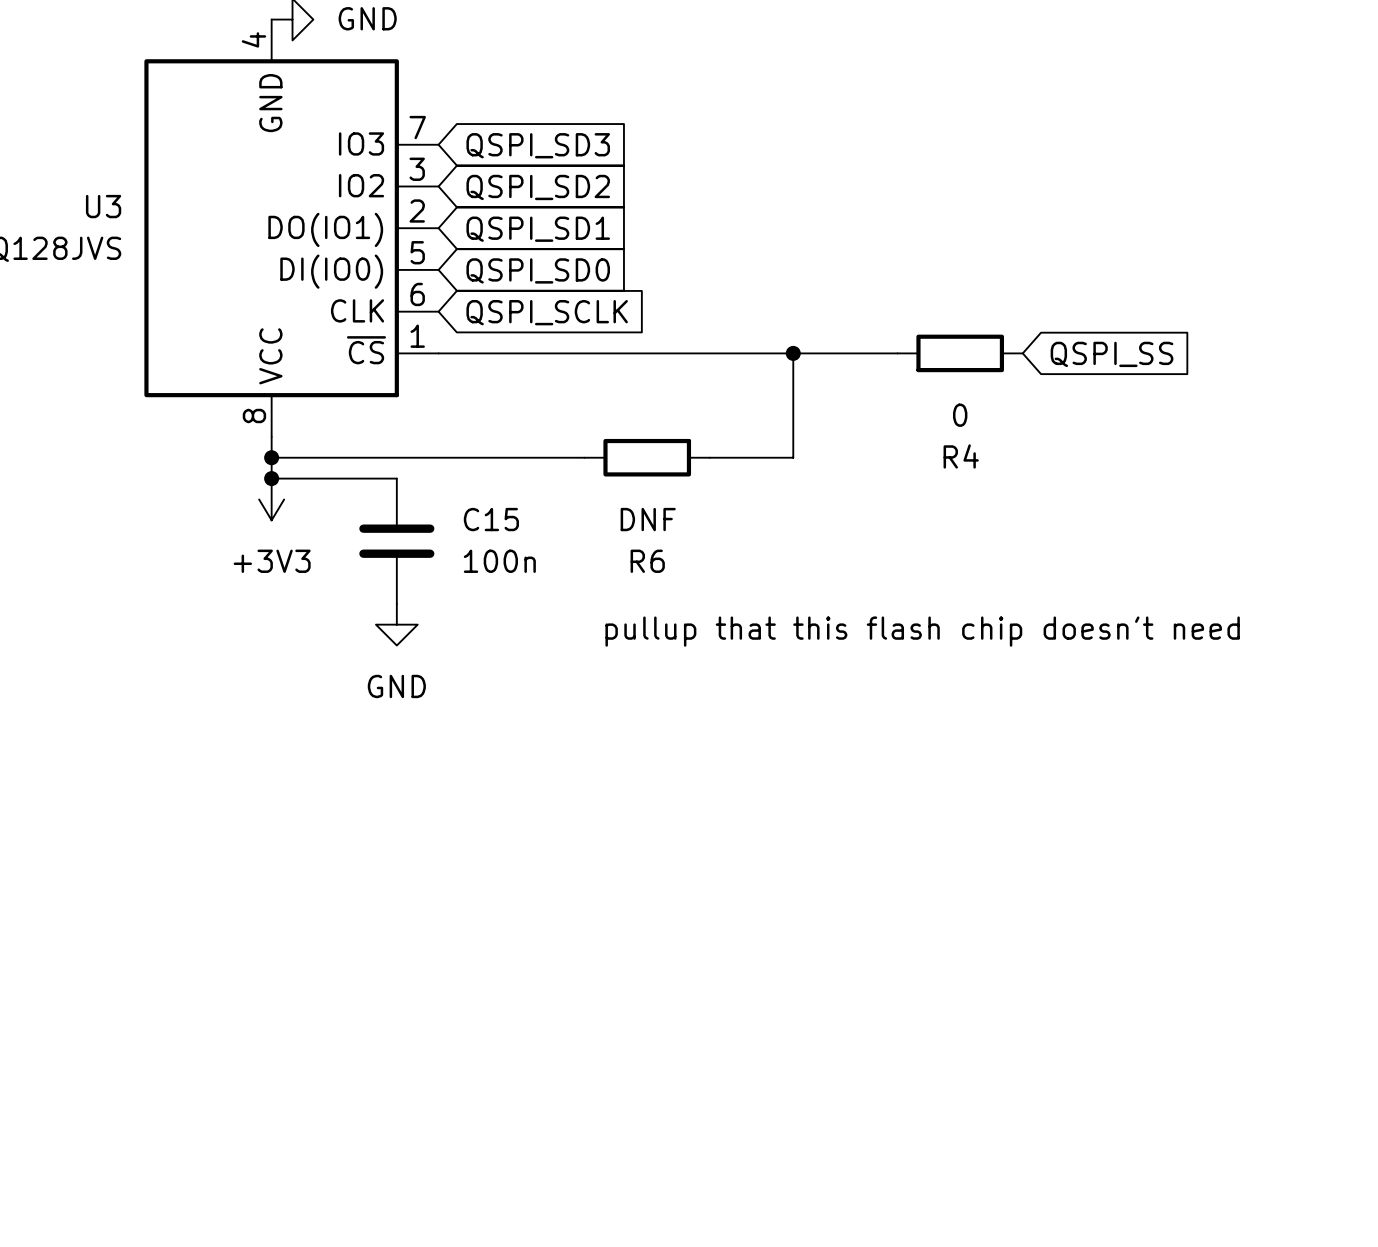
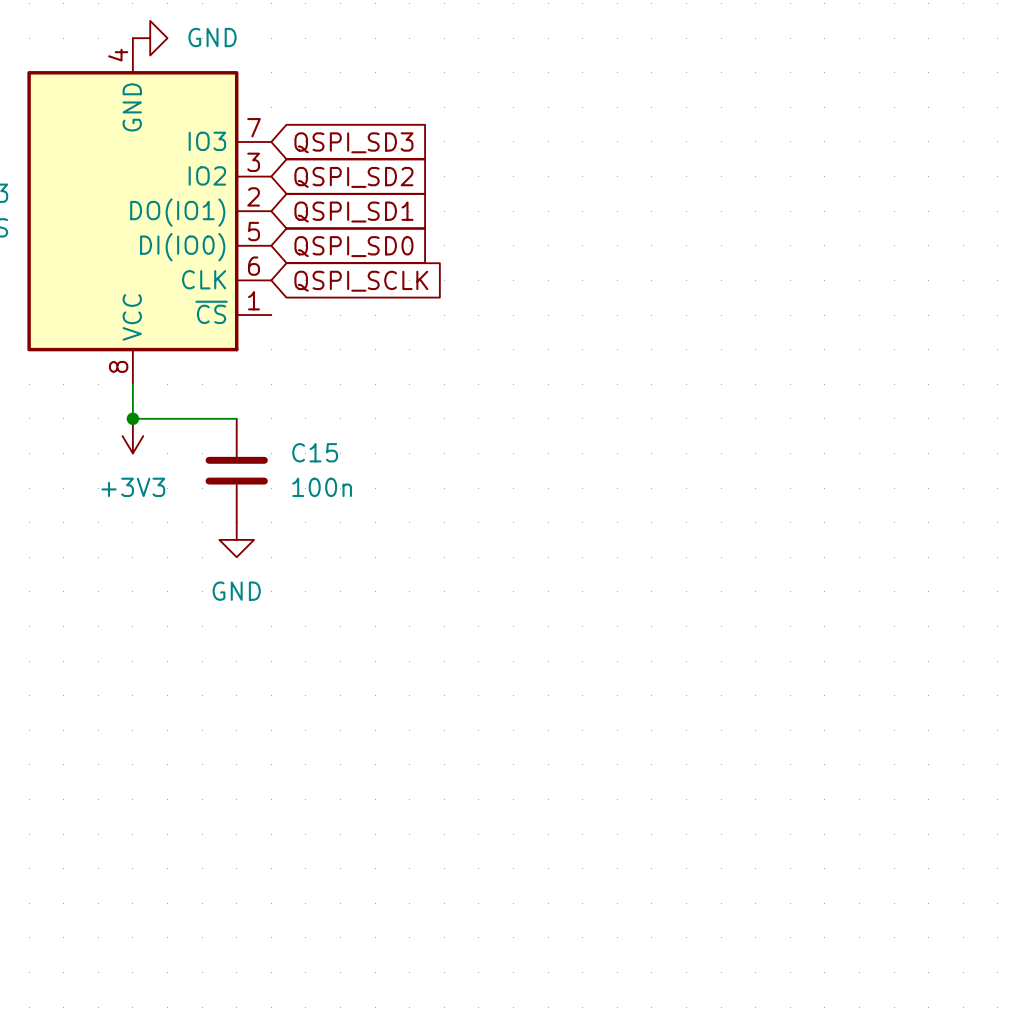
wire: (438, 353) (897, 353) -> none
wire: (793, 353) (793, 457) (709, 457) -> none
junction: (793, 353) -> none
R4: 0 (960, 353) -> none
global label: QSPI_SS (1112, 354) -> none
wire: (271, 457) (584, 457) -> none
junction: (271, 457) -> none
R6: DNF (647, 457) -> none
text: pullup that this flash chip doesn't need (922, 631) -> none

